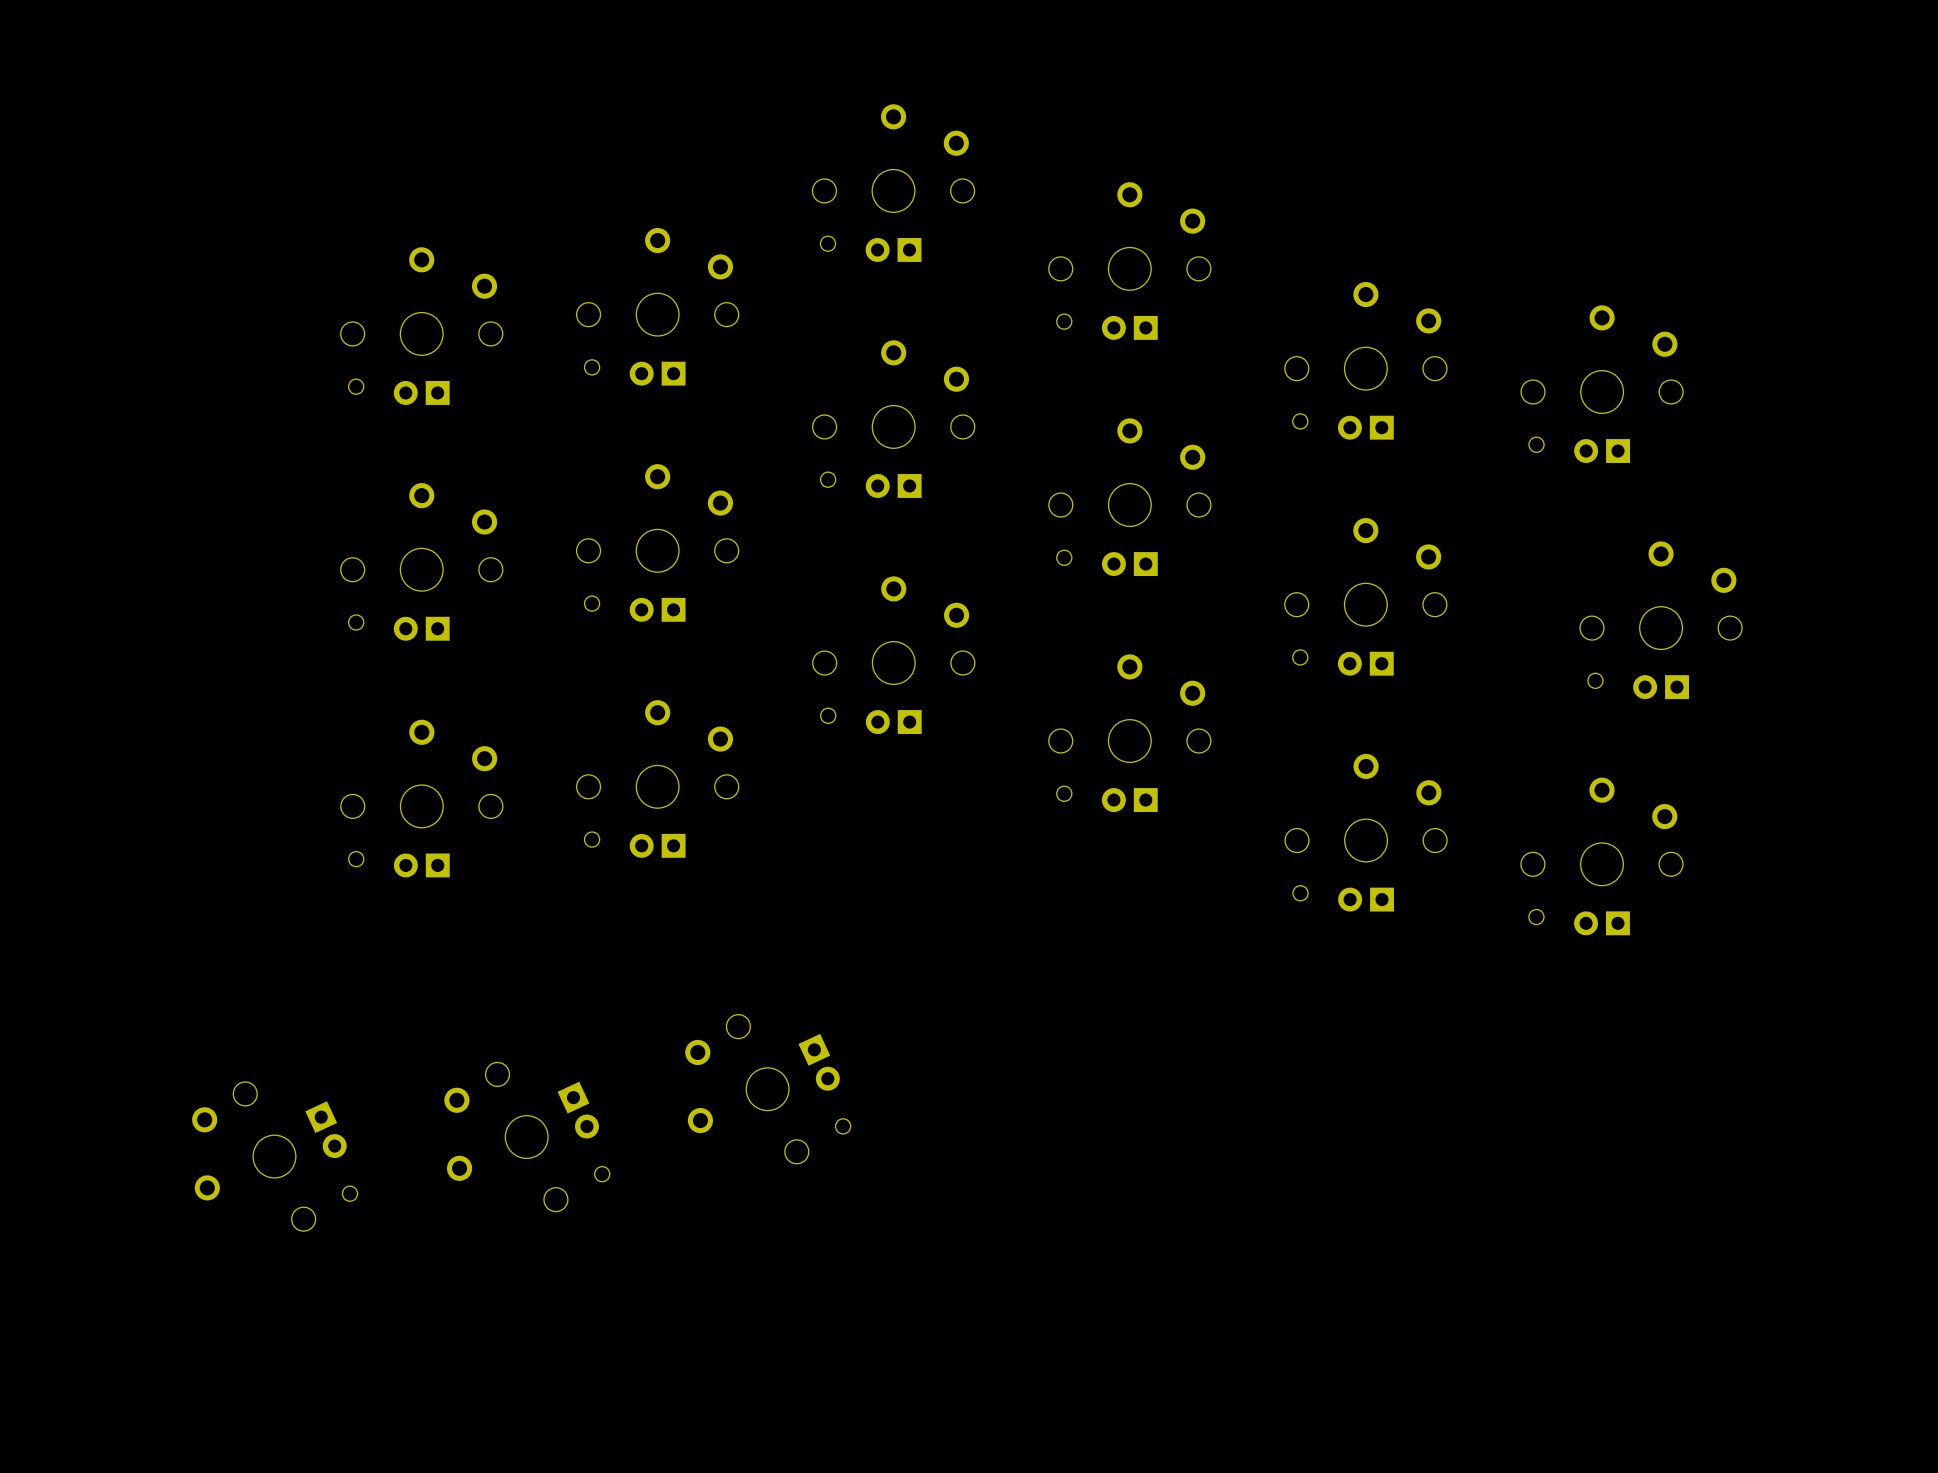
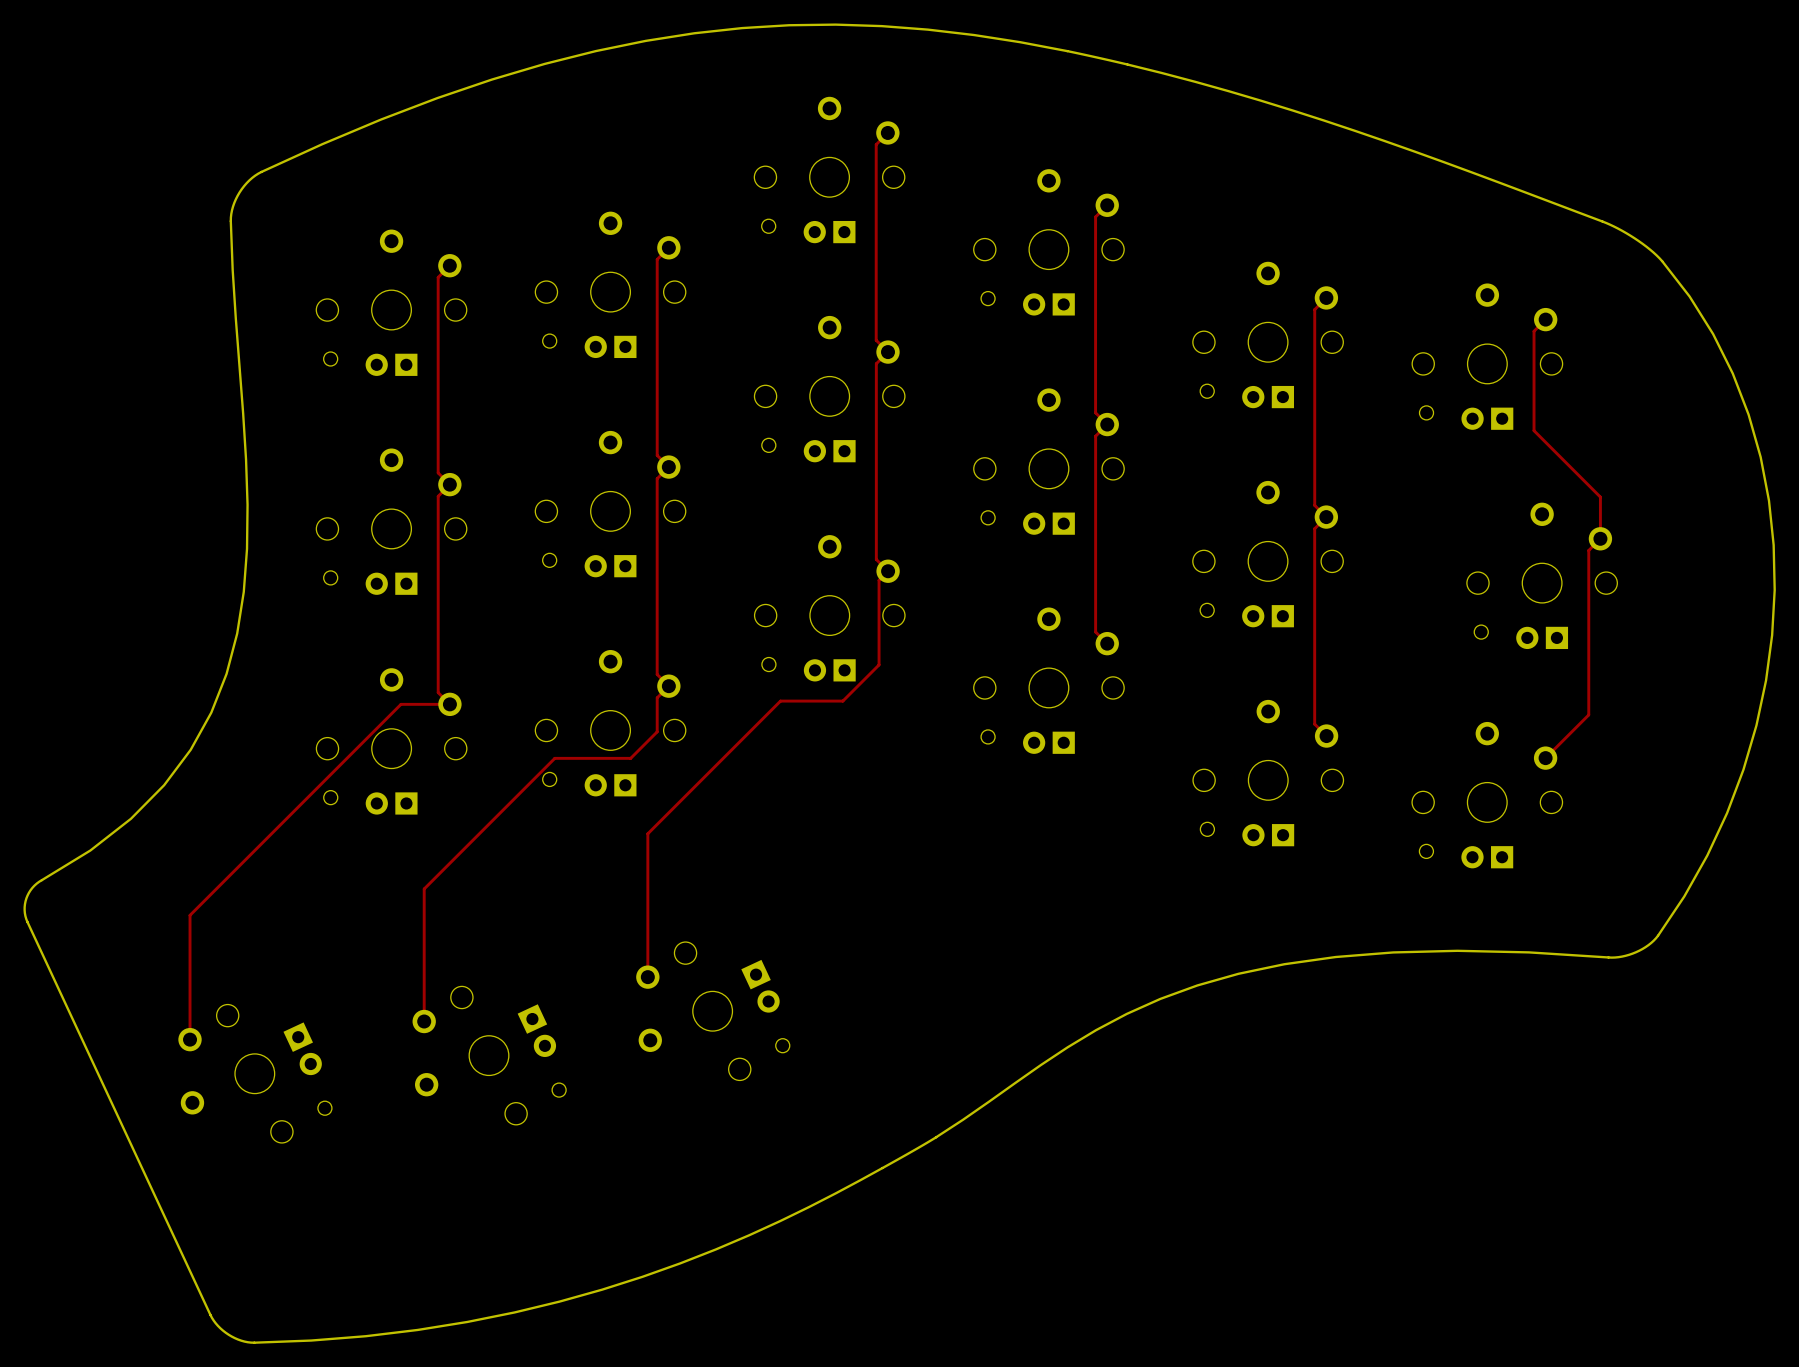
board edge: none -> (1067, 51) (974, 35) (927, 29) (835, 24) (742, 28) (645, 40) (544, 63) (437, 98) (322, 144) (261, 171) (249, 180) (239, 192) (233, 206) (230, 221) (246, 459) (247, 548) (243, 591) (237, 633) (226, 673) (211, 712) (190, 749) (164, 785) (130, 818) (90, 850) (36, 883) (27, 895) (24, 910) (27, 922) (210, 1314) (217, 1325) (228, 1334) (241, 1340) (254, 1342) (311, 1340) (417, 1329) (514, 1312) (602, 1289) (715, 1249) (809, 1207) (936, 1137) (1040, 1065) (1096, 1030) (1160, 998) (1197, 985) (1238, 973) (1284, 964) (1335, 957) (1393, 952) (1457, 950) (1622, 956) (1639, 950) (1653, 940) (1684, 896) (1707, 855) (1727, 813) (1743, 769) (1756, 725) (1766, 680) (1772, 635) (1774, 590) (1773, 545) (1769, 500) (1760, 457) (1748, 414) (1732, 373) (1713, 334) (1689, 296) (1653, 252) (1630, 235) (1602, 221) (1414, 151) (1293, 110) (1161, 72) (1067, 51)
track: none -> (887, 132) (876, 144) (876, 340) (888, 352) (876, 363) (876, 559) (888, 571) (879, 580) (879, 664) (842, 701) (780, 701) (647, 833) (647, 977)
track: none -> (1107, 205) (1095, 216) (1095, 412) (1107, 424) (1095, 436) (1095, 632) (1107, 643)
track: none -> (668, 247) (657, 259) (657, 455) (668, 467) (657, 478) (657, 674) (668, 686) (657, 697) (657, 731) (630, 758) (554, 758) (424, 888) (424, 1021)
track: none -> (449, 265) (438, 277) (438, 472) (449, 484) (438, 496) (438, 692) (449, 704) (400, 704) (190, 915) (190, 1039)
track: none -> (1326, 297) (1314, 309) (1314, 505) (1326, 517) (1314, 528) (1314, 724) (1326, 736)
track: none -> (1545, 319) (1534, 331) (1534, 430) (1600, 497) (1600, 538) (1588, 550) (1588, 714) (1545, 758)

